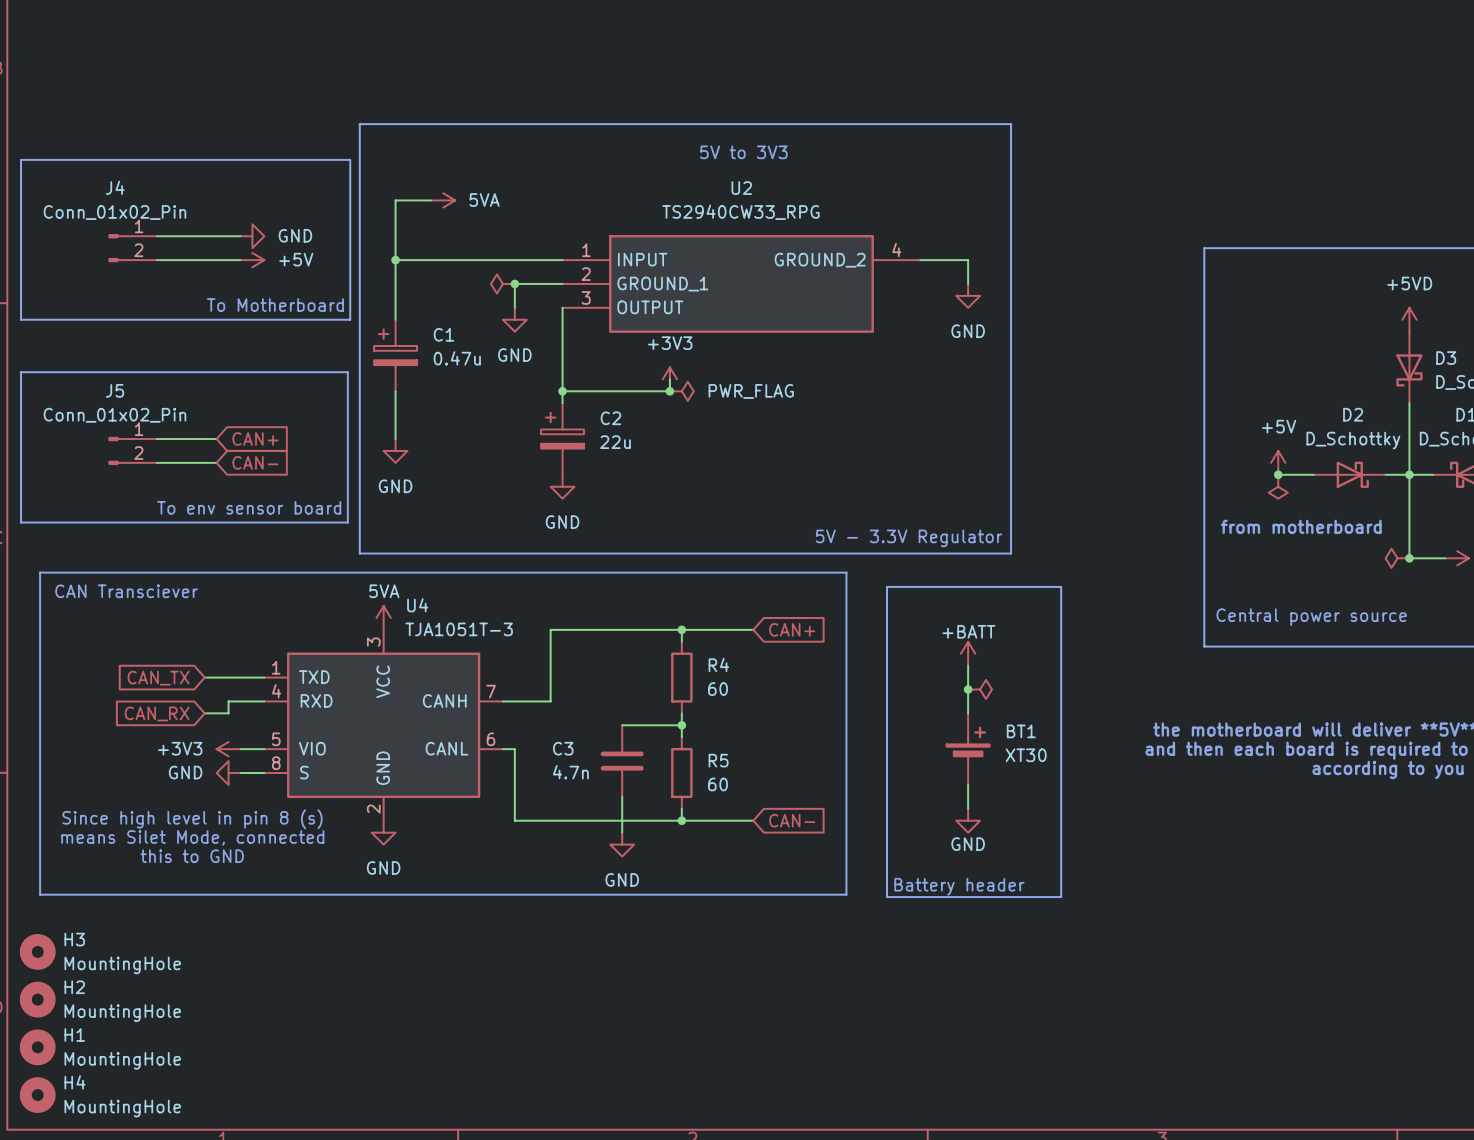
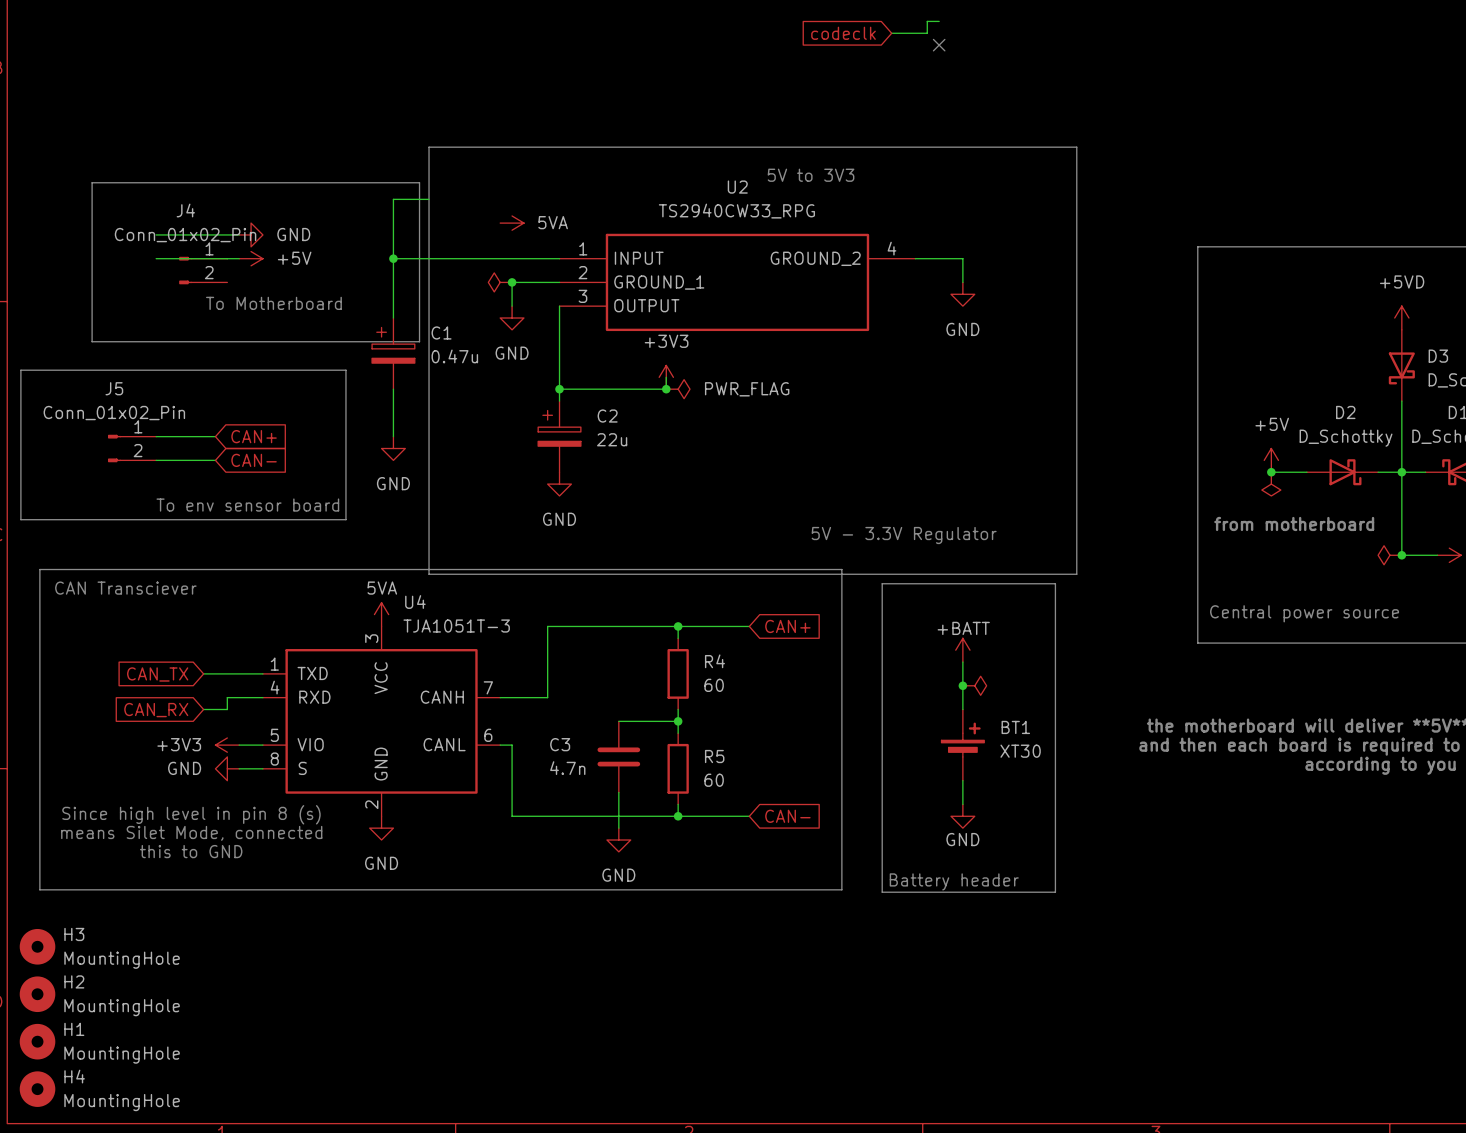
wire: none -> (939, 21) (927, 21) (927, 33) (891, 33)
global label: none -> codeclk (843, 33)
no-connect mark: none -> (939, 45)
line: (359, 124) (1011, 124) (1011, 553) (359, 553) (359, 124) -> (429, 147) (1076, 147) (1076, 574) (429, 574) (429, 147)
text position: 5V to 3V3 (743, 152) -> 5V to 3V3 (811, 175)
line: (21, 159) (21, 319) (350, 319) (350, 159) (21, 159) -> (92, 182) (92, 341) (419, 341) (419, 182) (92, 182)
power symbol position: 5VA (443, 200) -> 5VA (512, 223)
J4 position: (132, 248) -> (203, 270)

